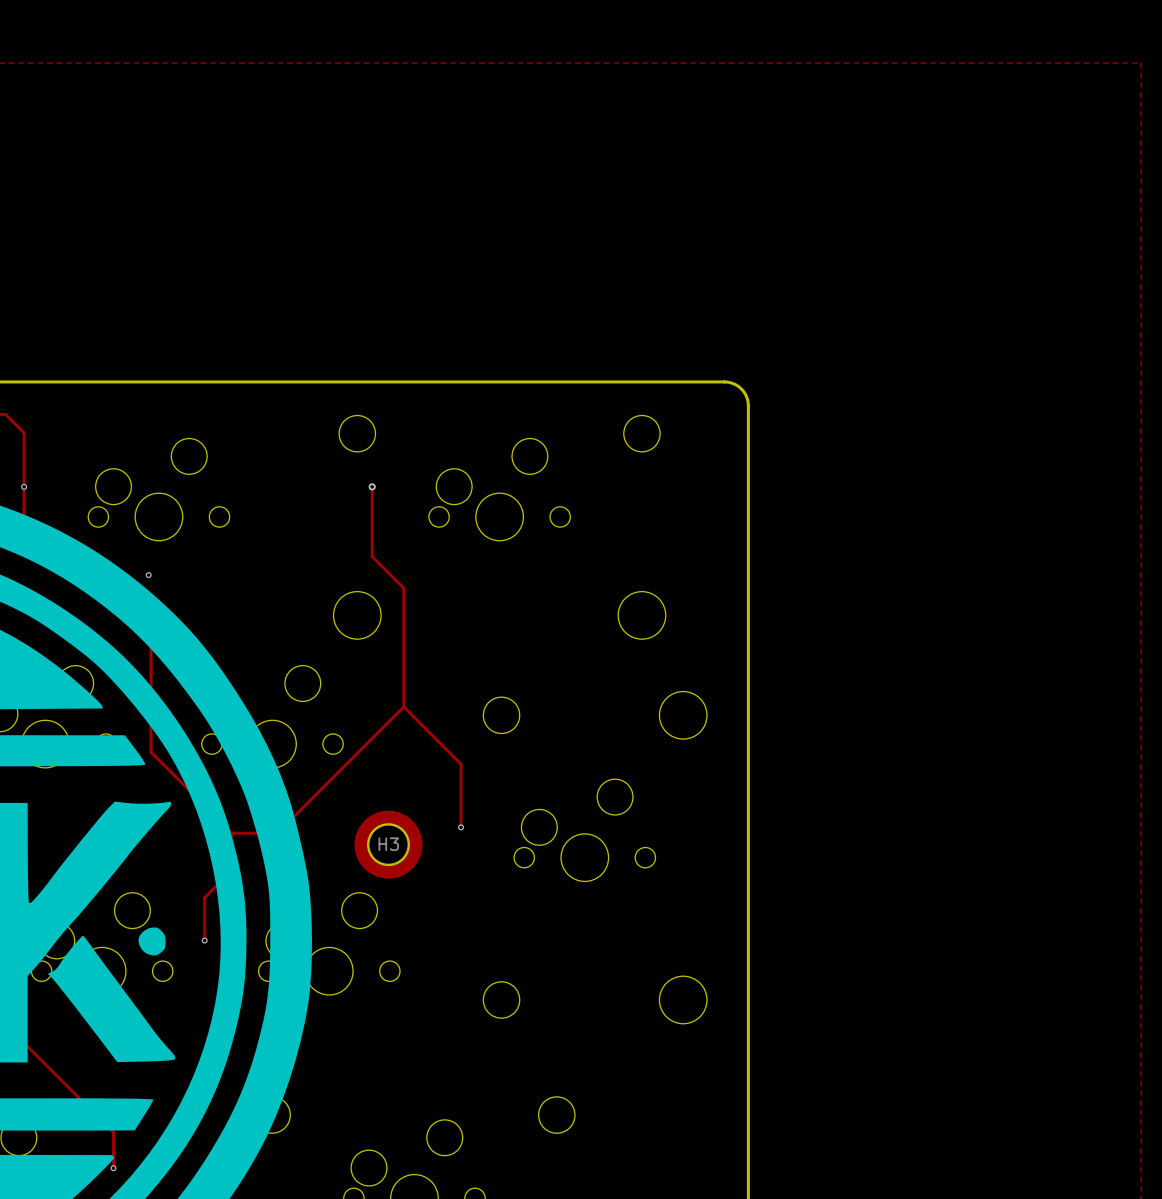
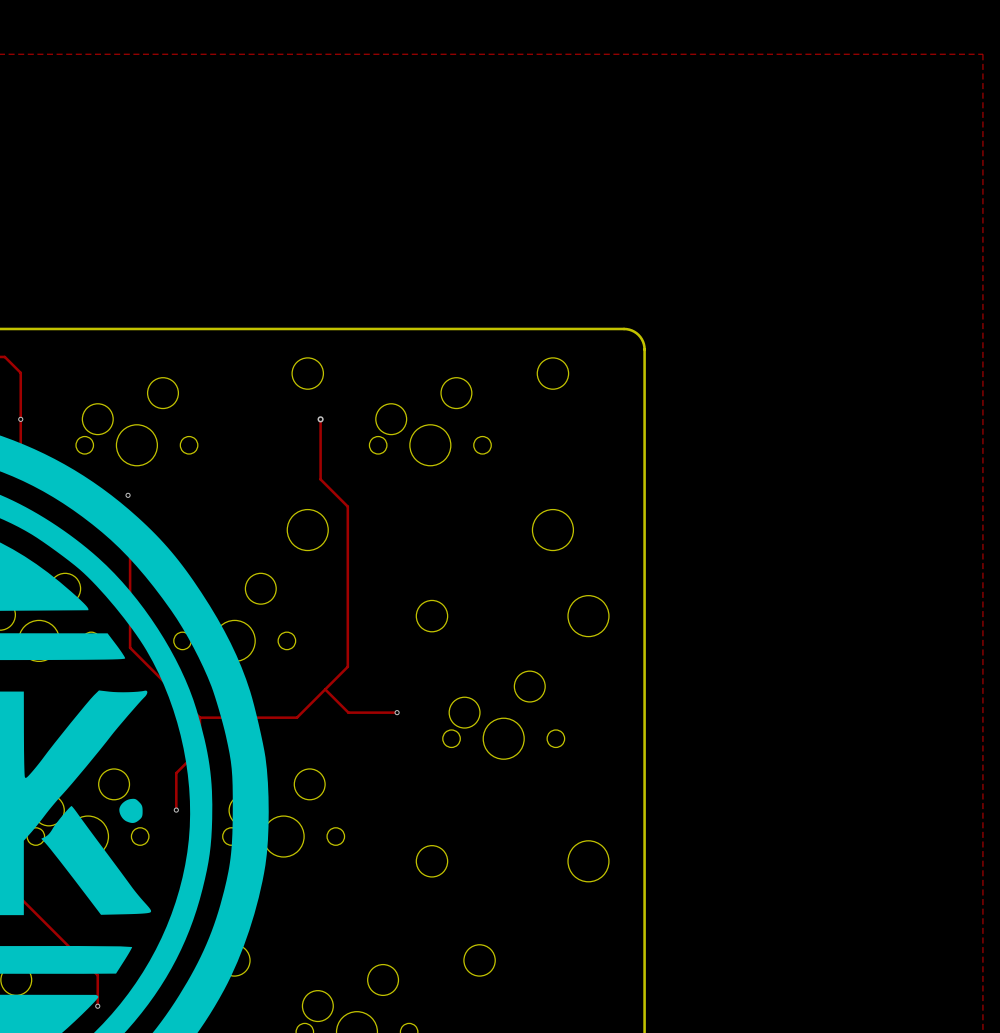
track: none -> (347, 608) (347, 666) (296, 717) (238, 717)
track: (461, 827) (461, 764) (403, 706) (277, 833) -> (397, 712) (348, 712) (325, 689)
H3: (388, 844) -> none

